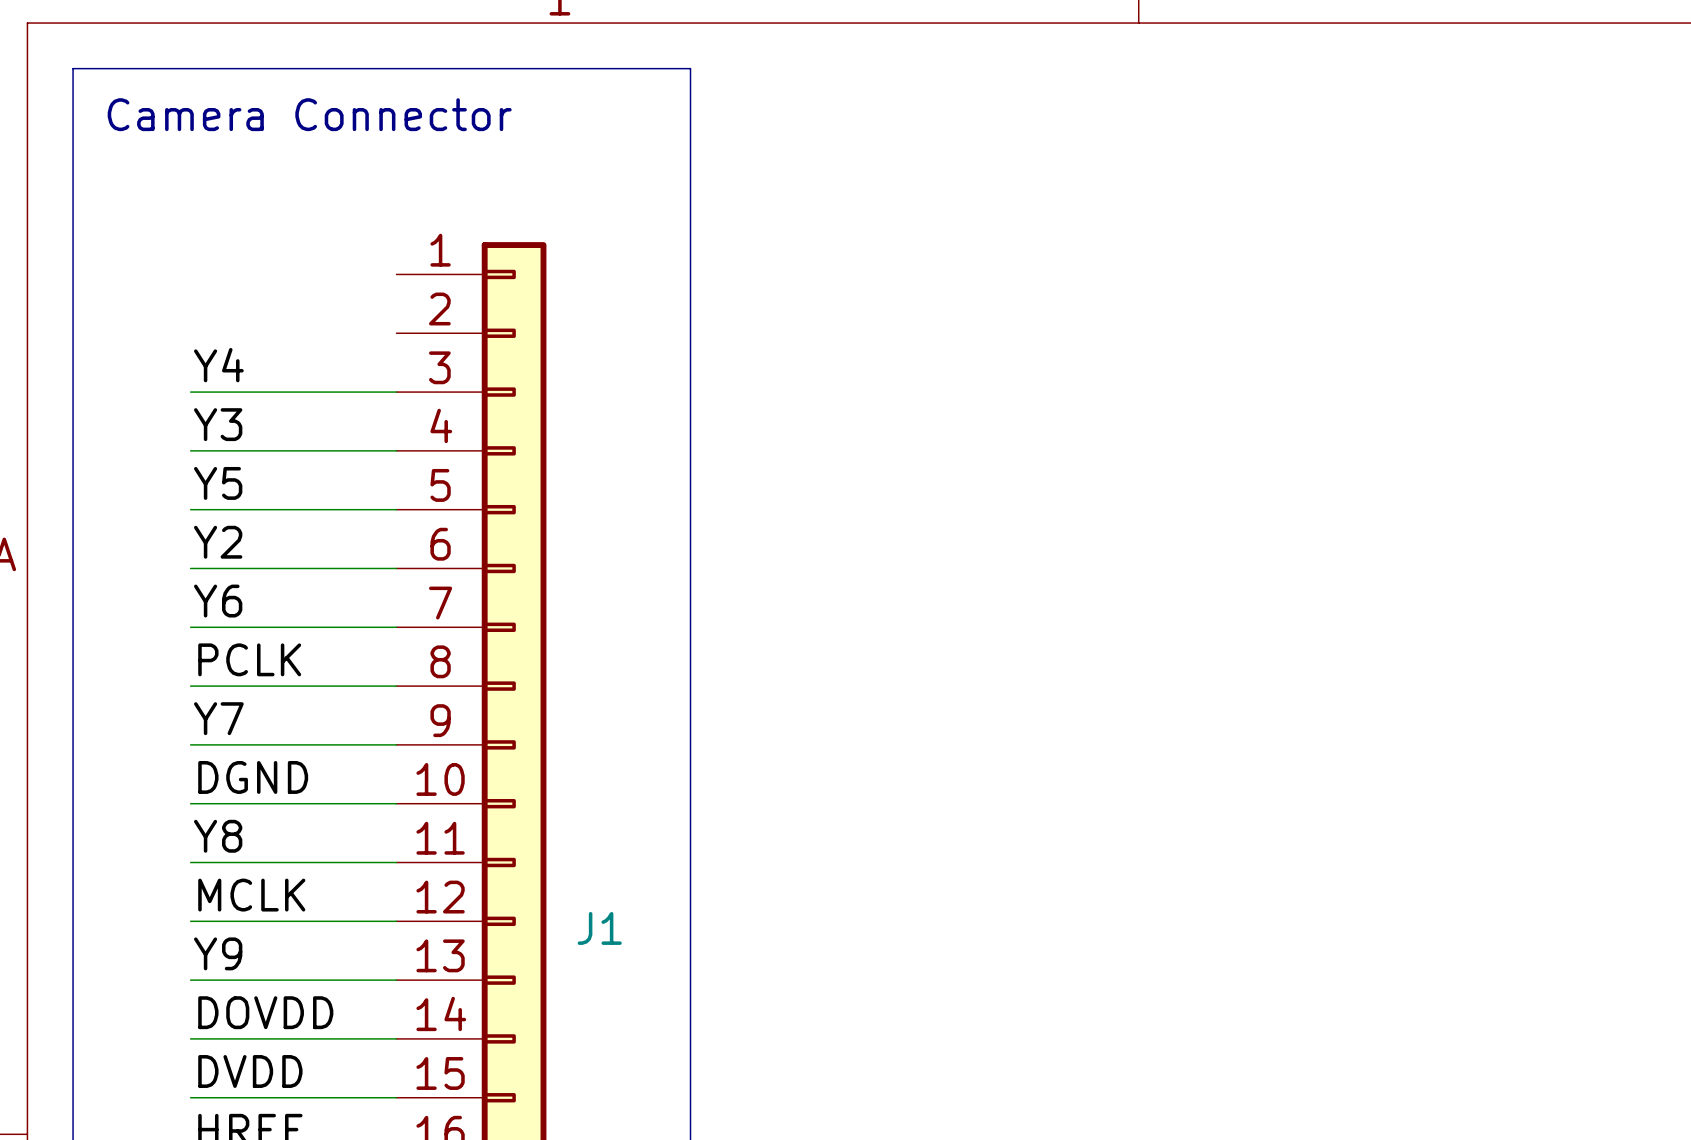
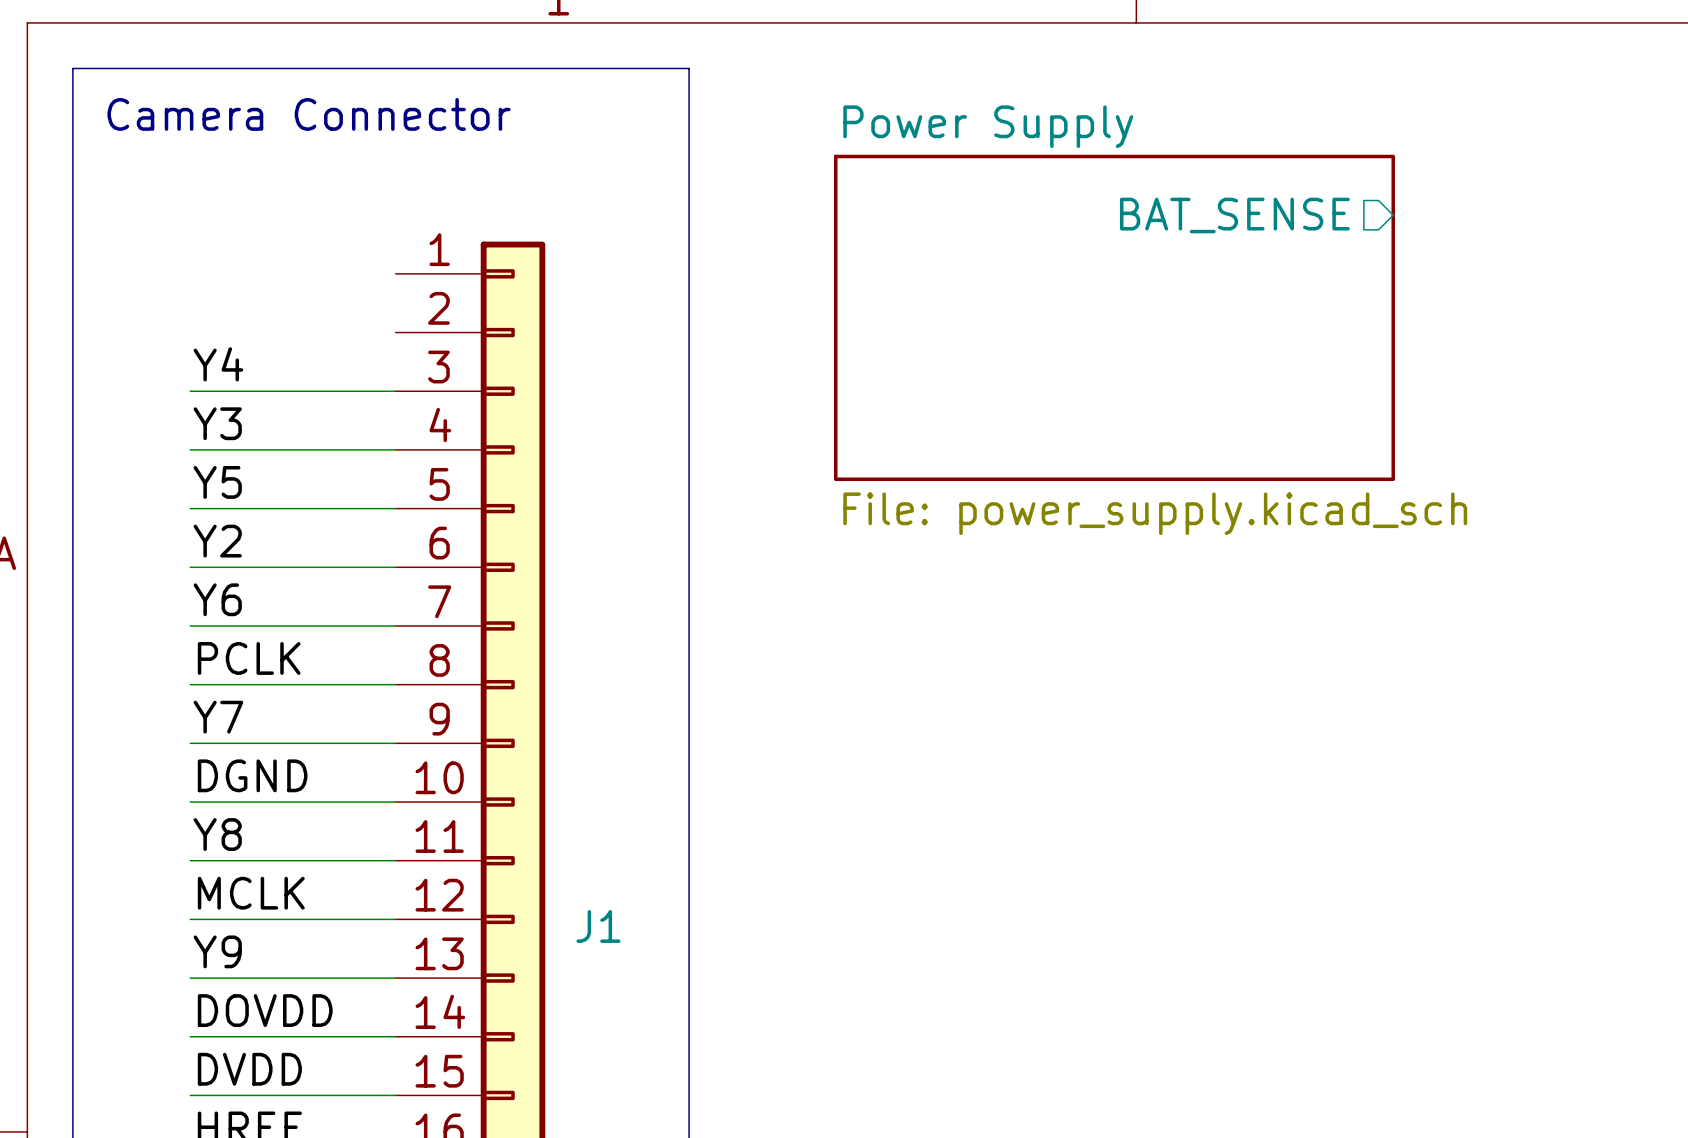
sheet pin: none -> BAT_SENSE (1234, 215)
sheet Power Supply: none -> File: power_supply.kicad_sch (1114, 317)

